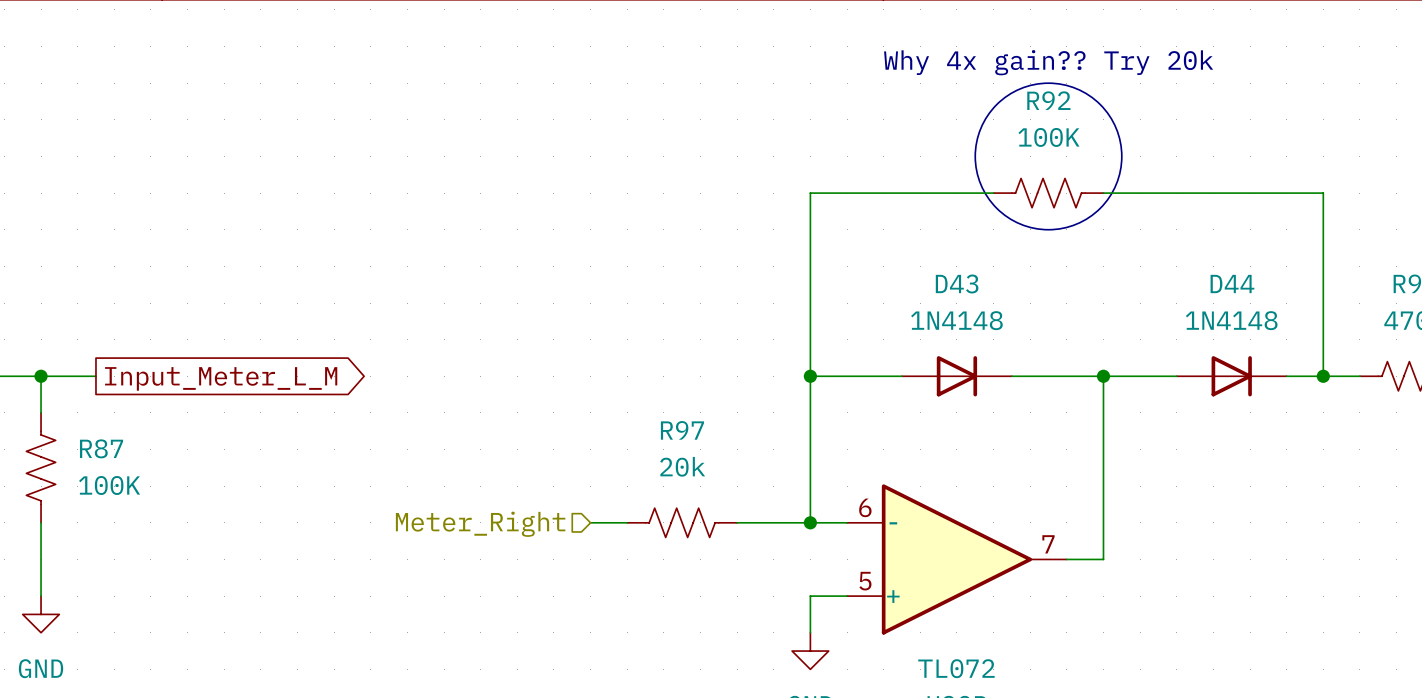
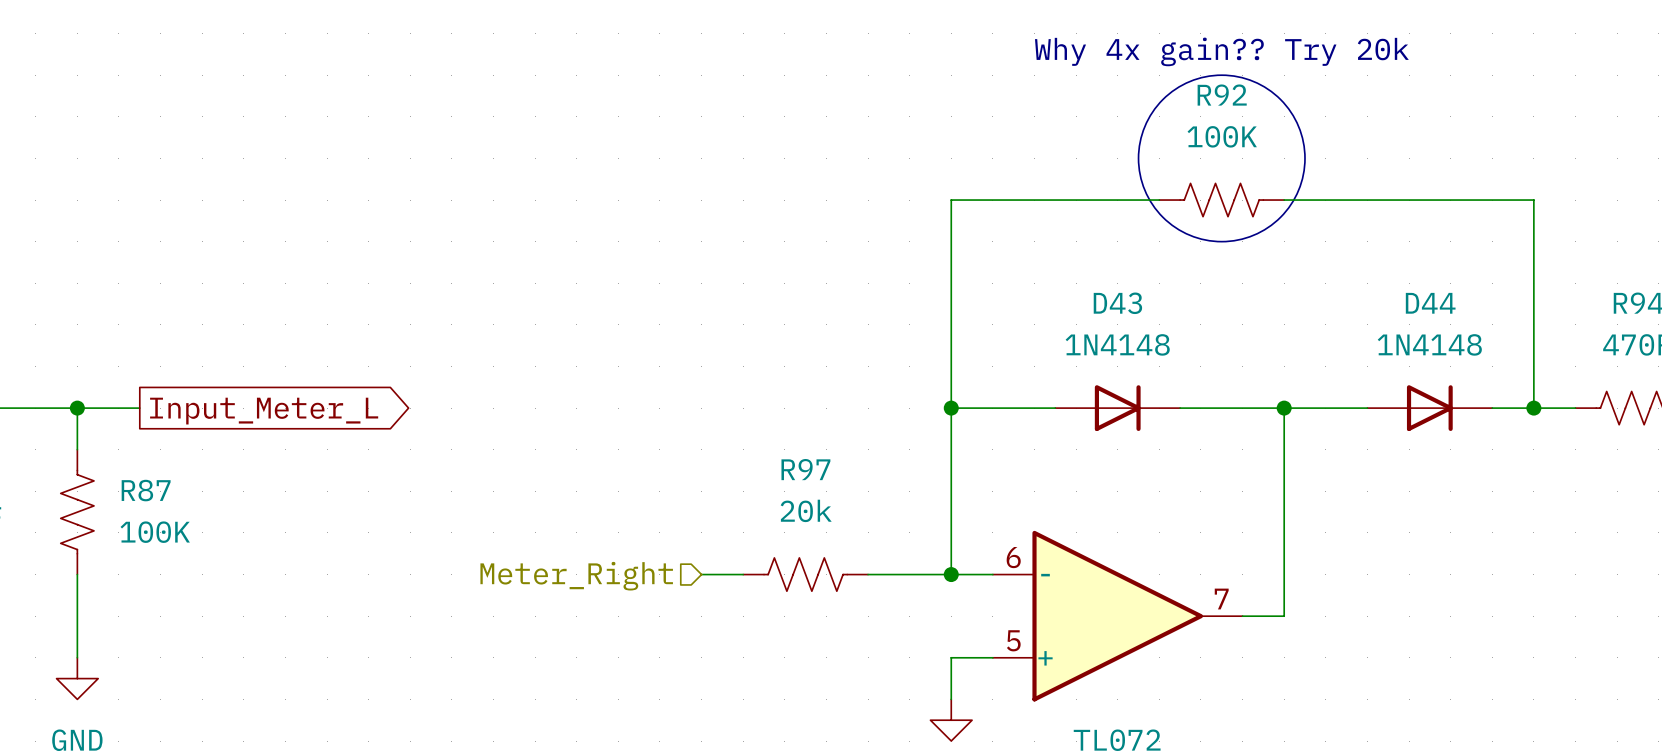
global label: Input_Meter_L_M (221, 378) -> Input_Meter_L (264, 411)

